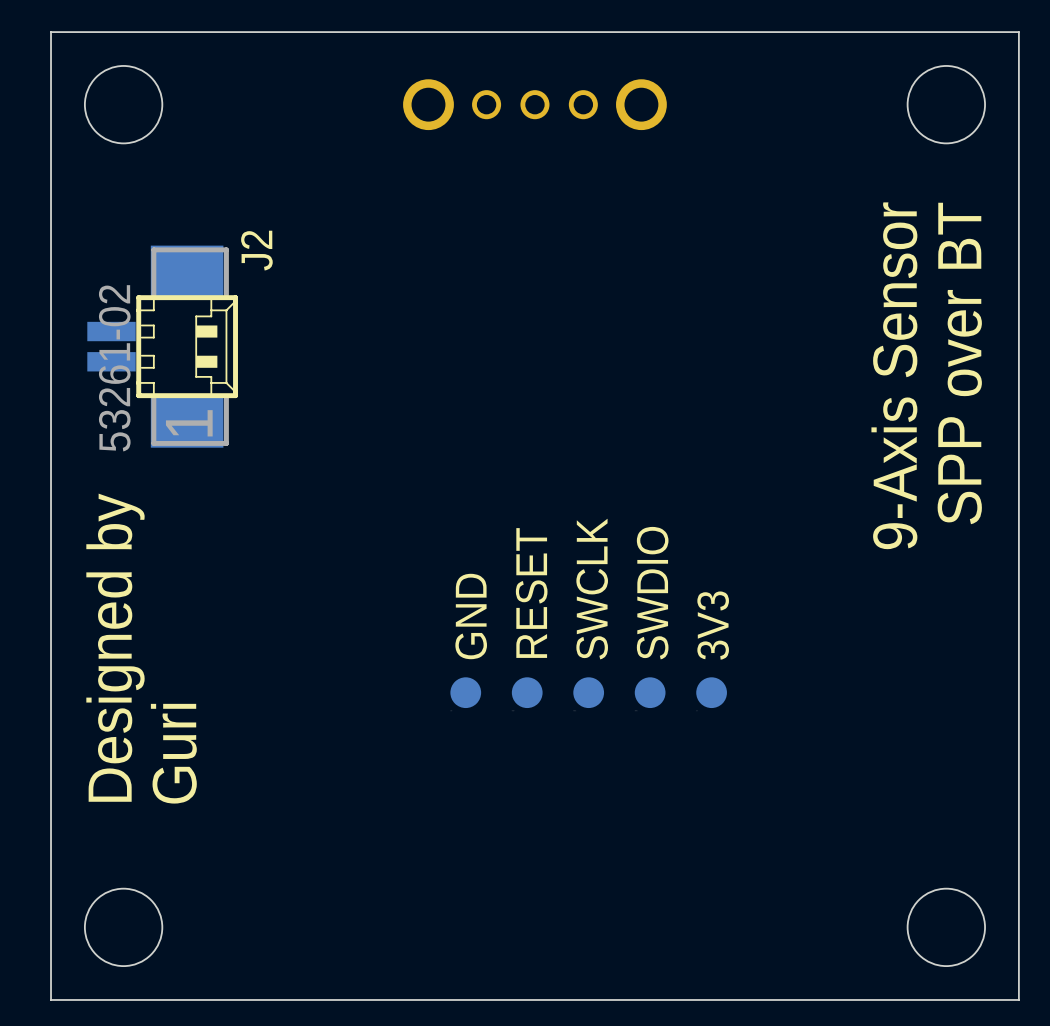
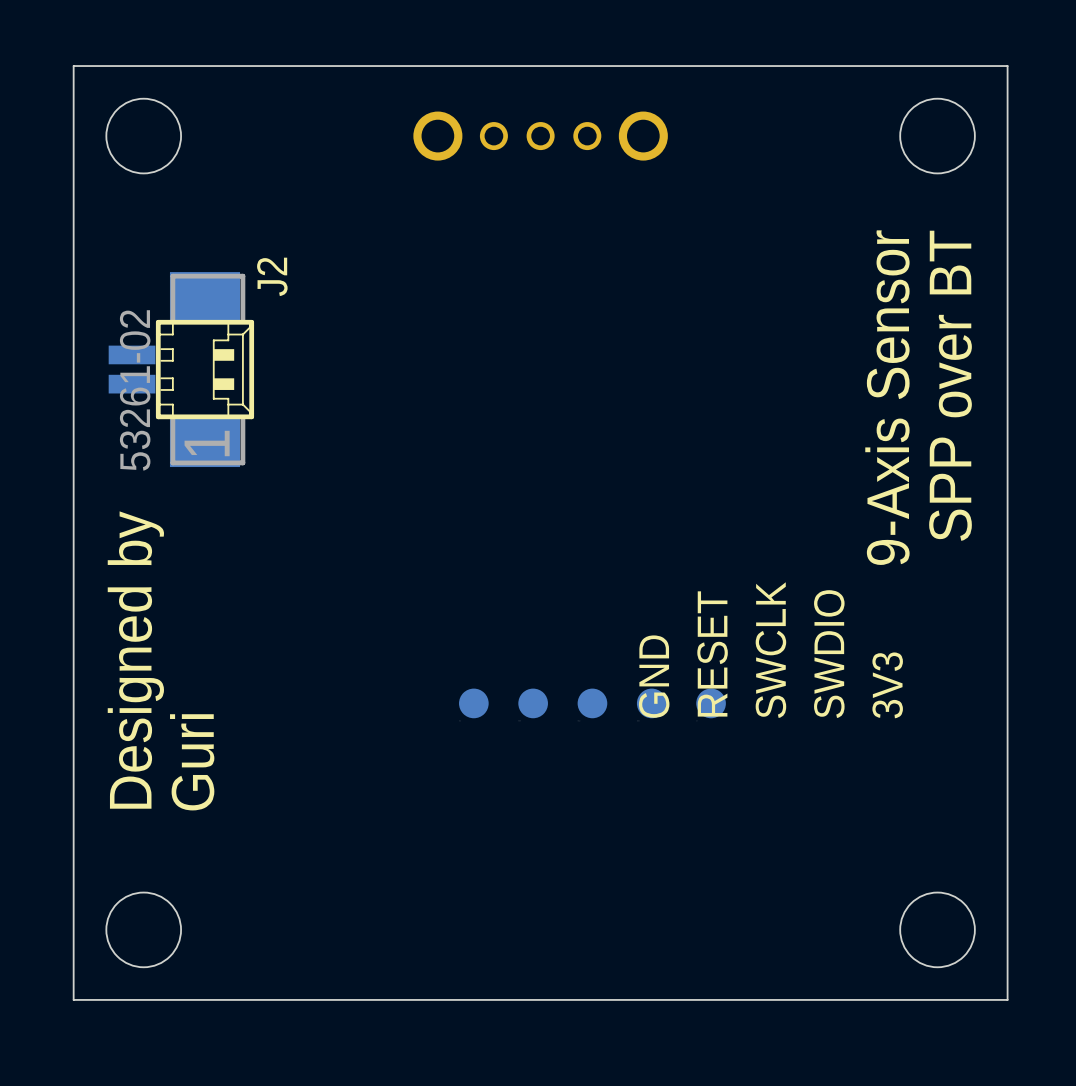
text position: SWCLK (592, 589) -> SWCLK (770, 650)
text position: RESET (531, 593) -> RESET (712, 653)
text position: SWDIO (652, 593) -> SWDIO (829, 654)
text position: GND (471, 616) -> GND (654, 676)
text position: 3V3 (713, 625) -> 3V3 (887, 685)

